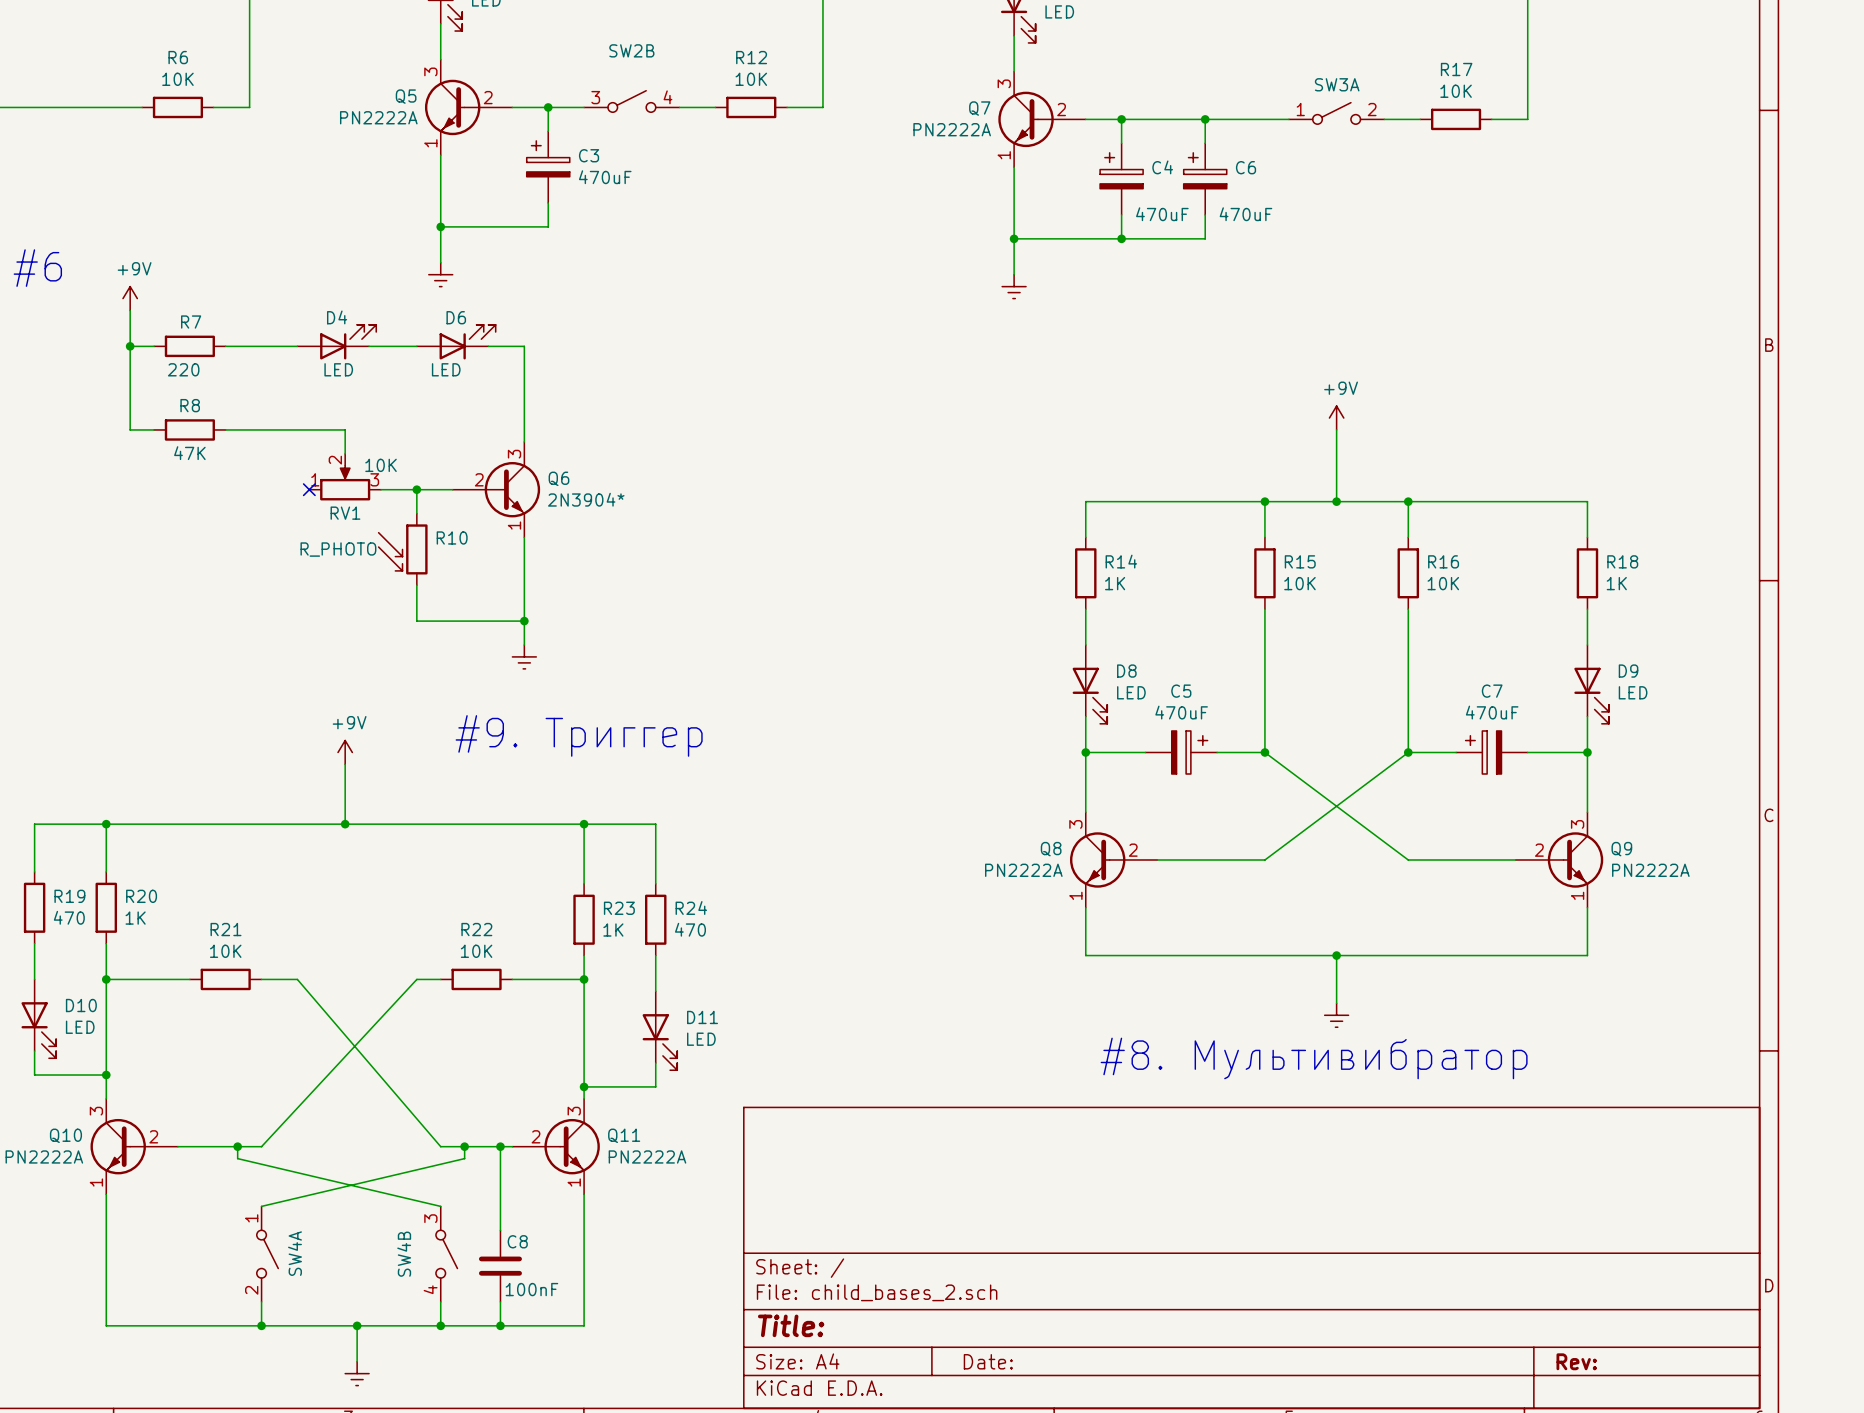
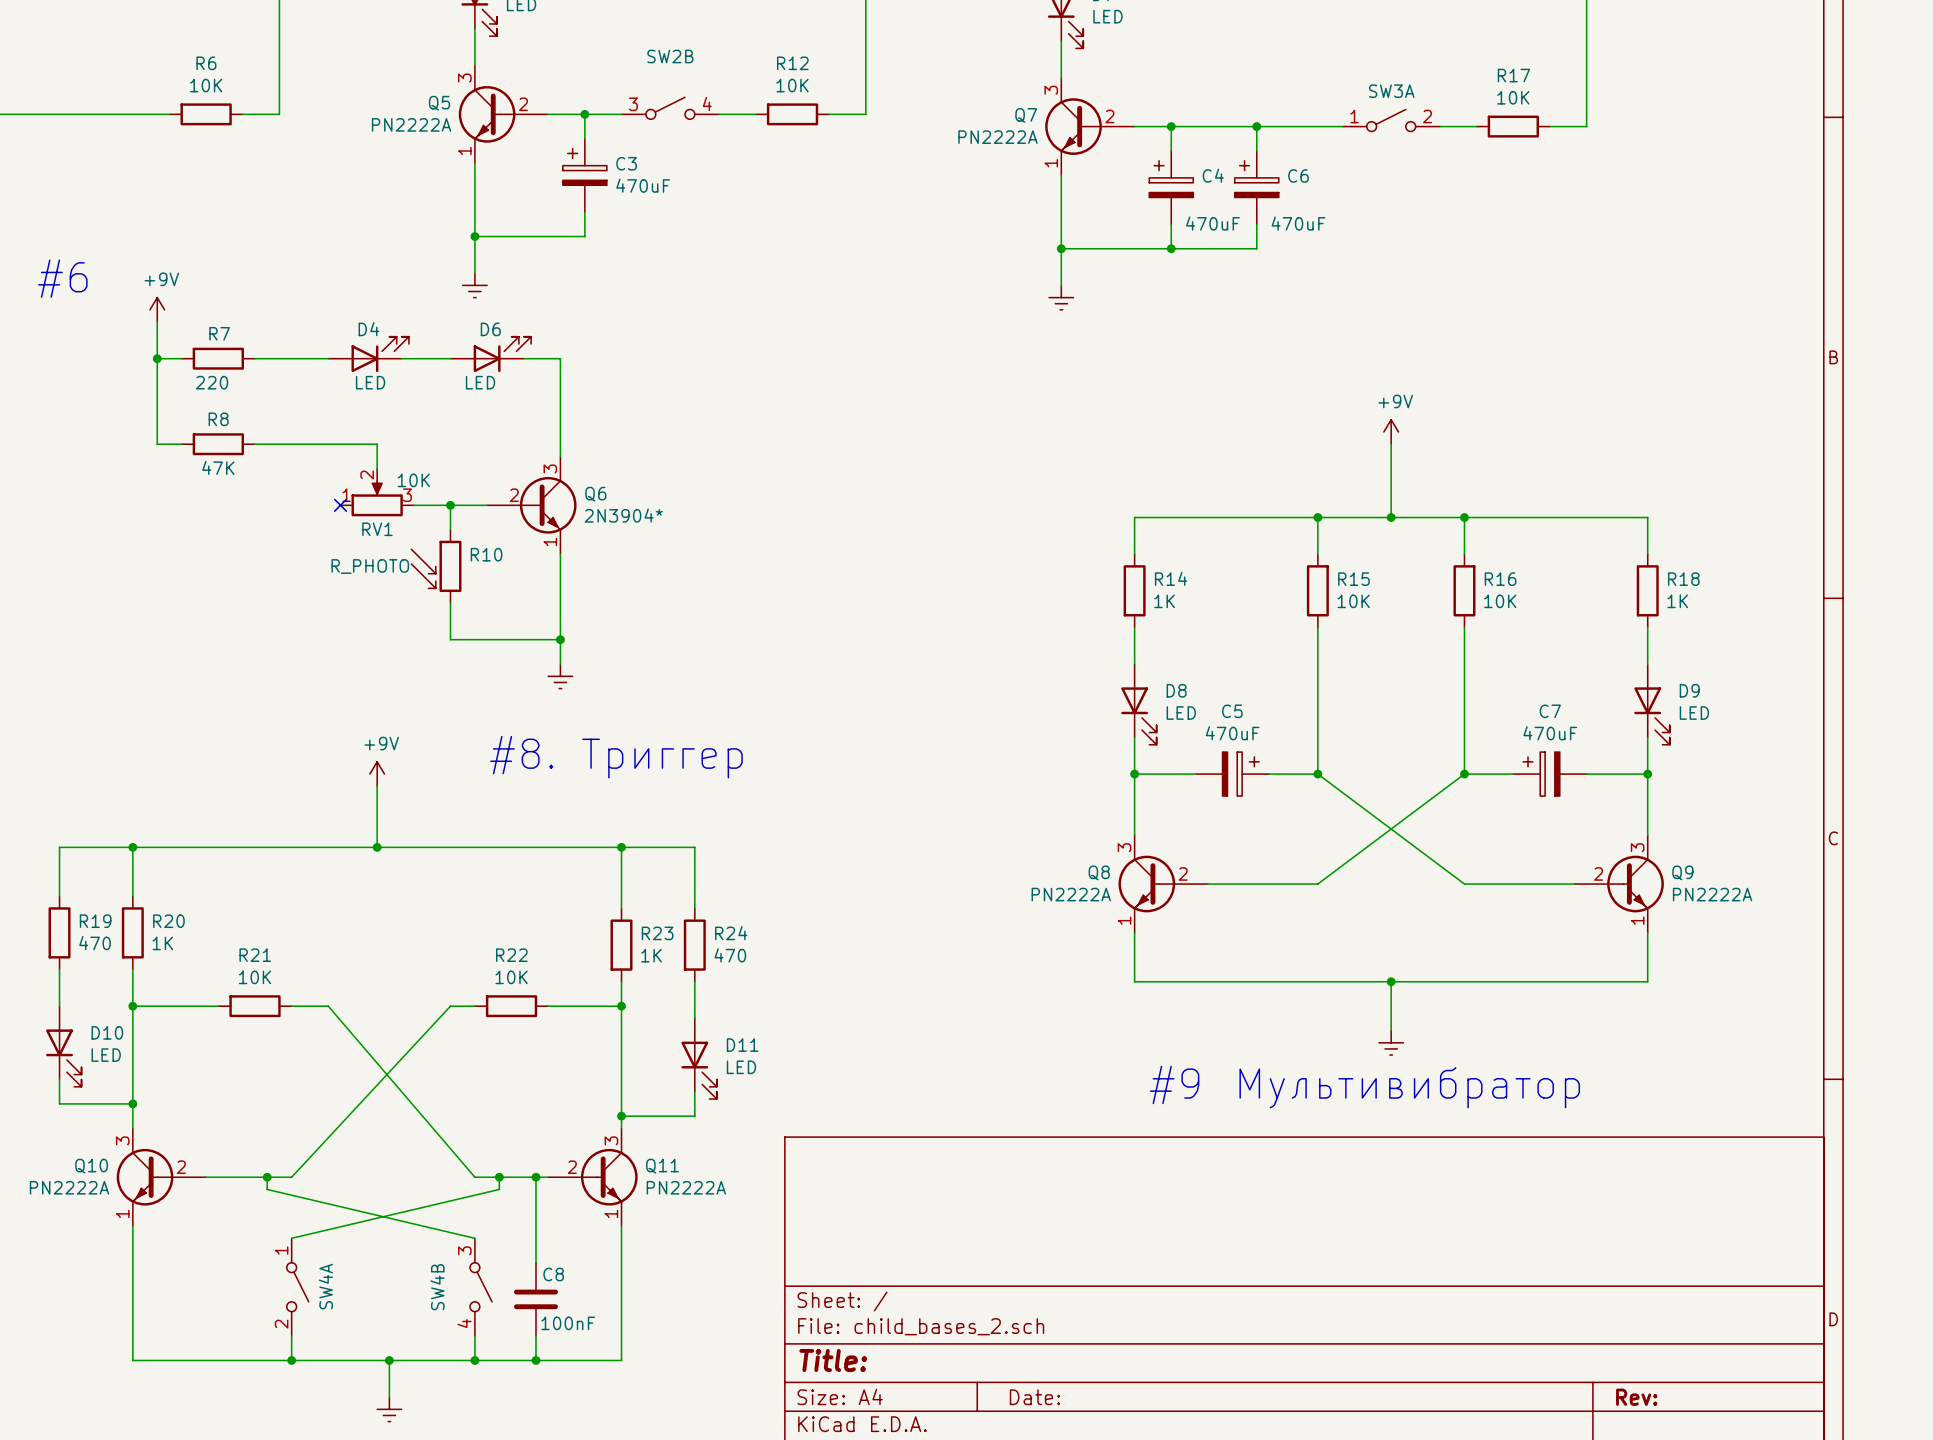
text: #9. Триггер (579, 735) -> #8. Триггер (616, 757)
text: #8. Мультивибратор (1314, 1058) -> #9 (1174, 1084)
text: none -> Мультивибратор (1409, 1087)

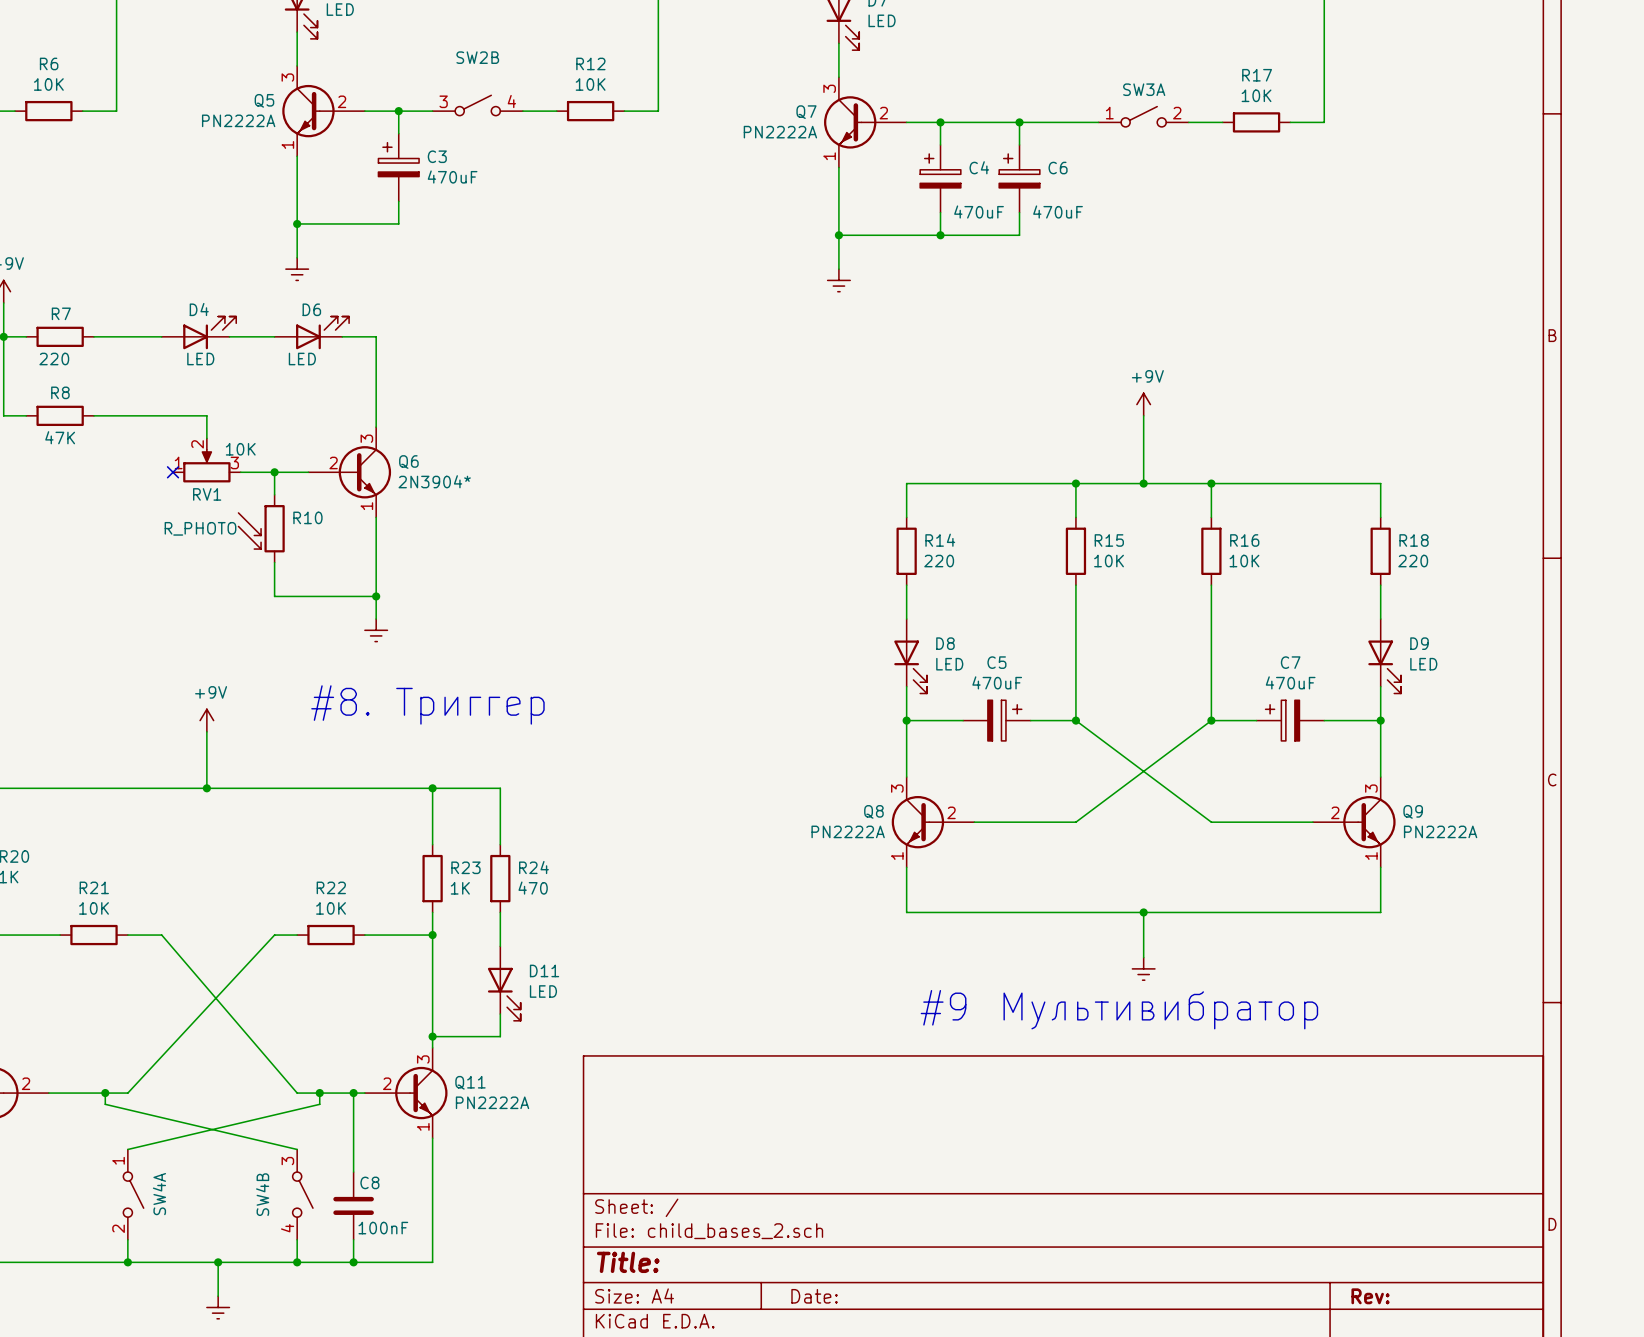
R14 value: 1K (1164, 601) -> 220 (939, 561)
R18 value: 1K (1677, 601) -> 220 (1413, 561)

